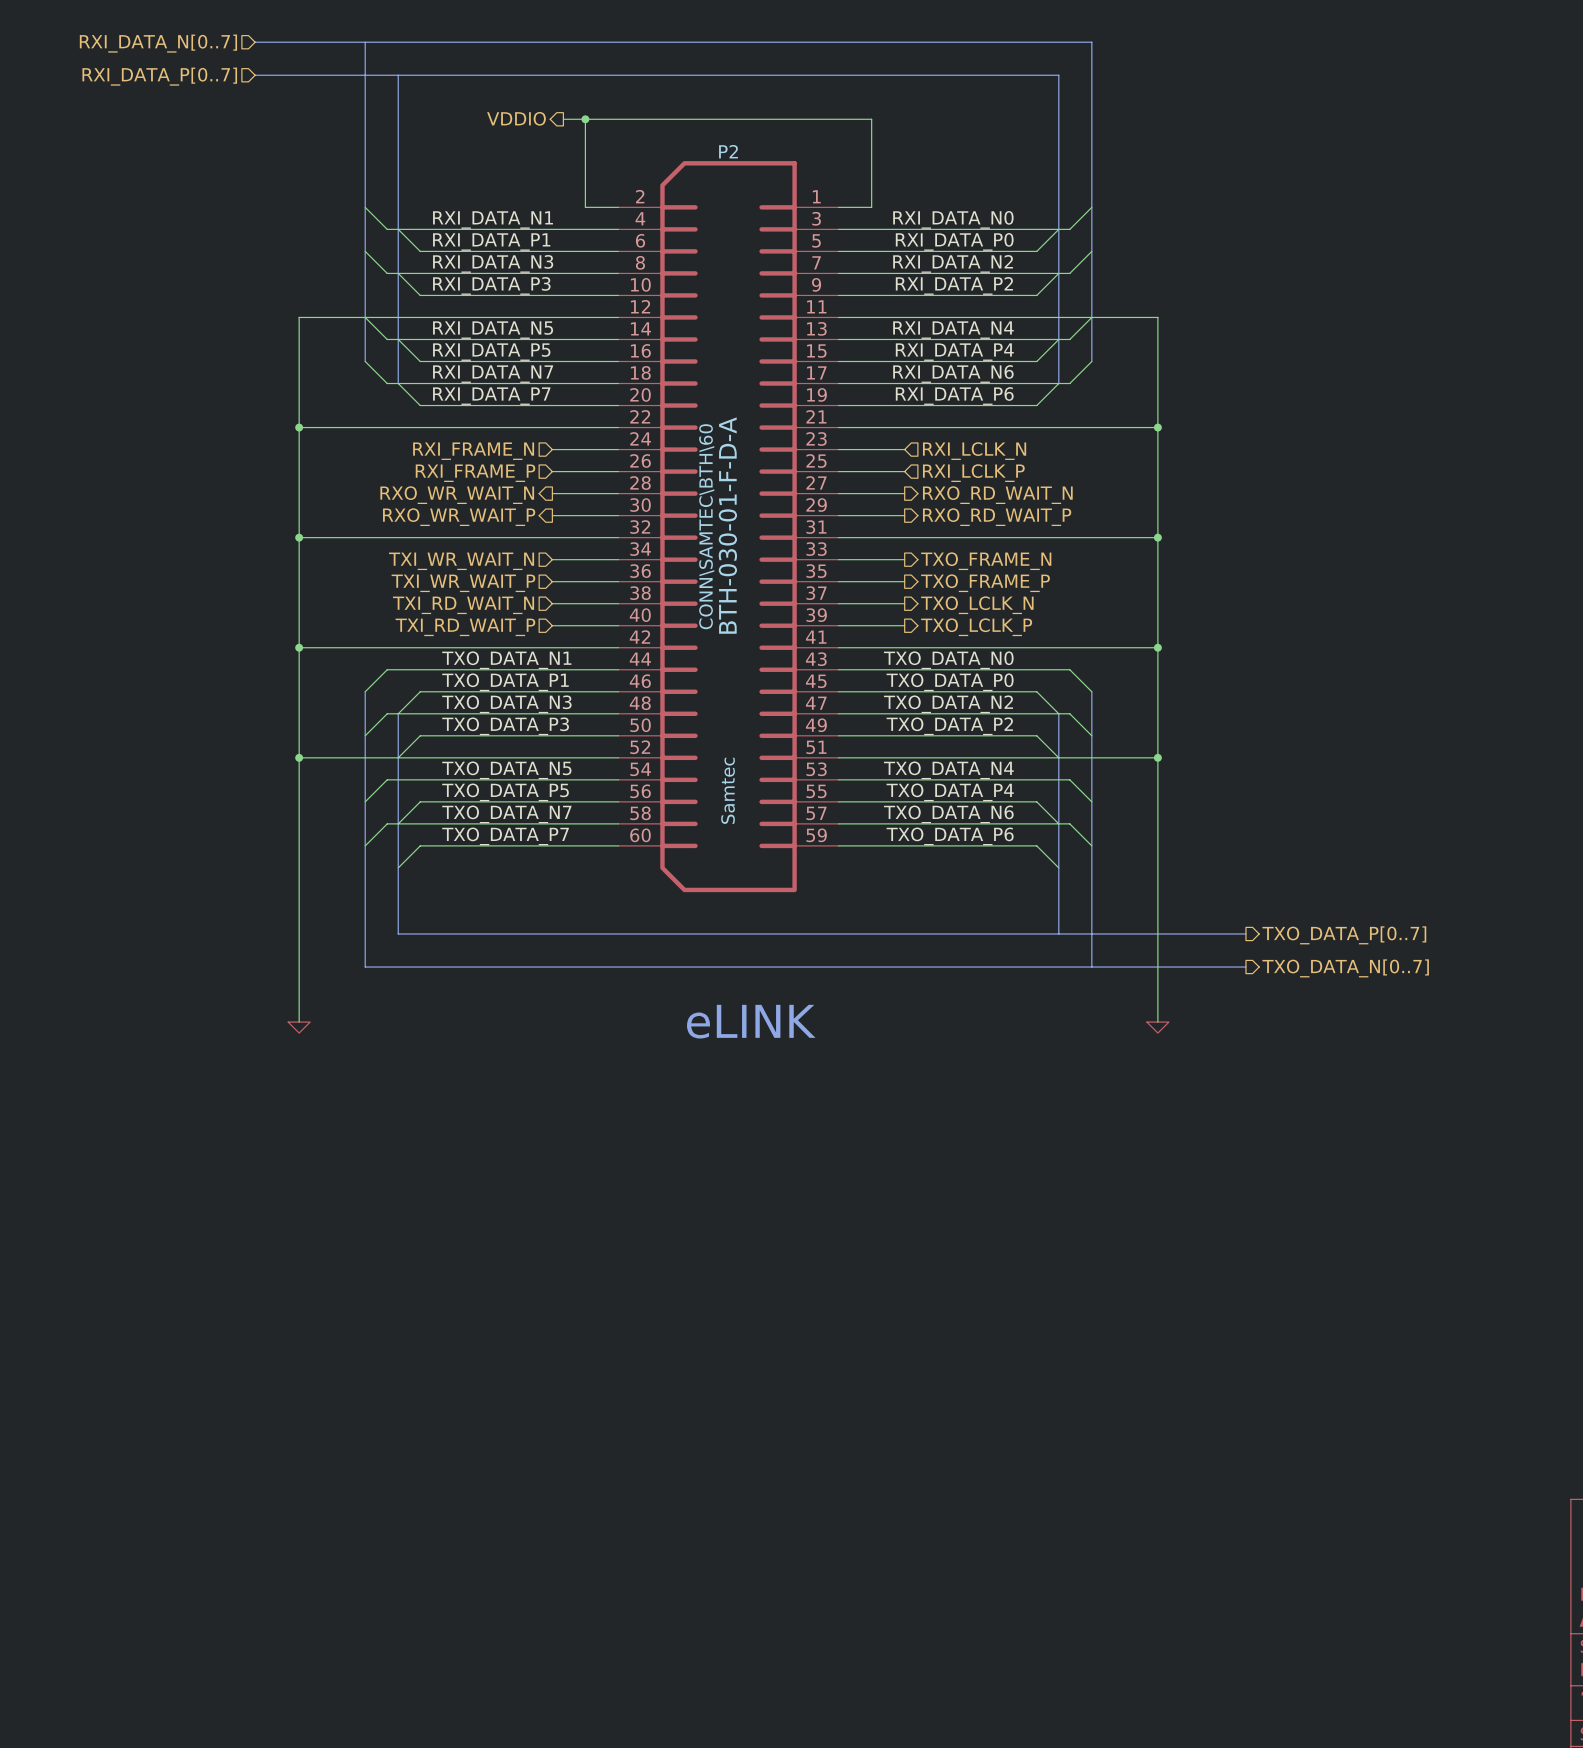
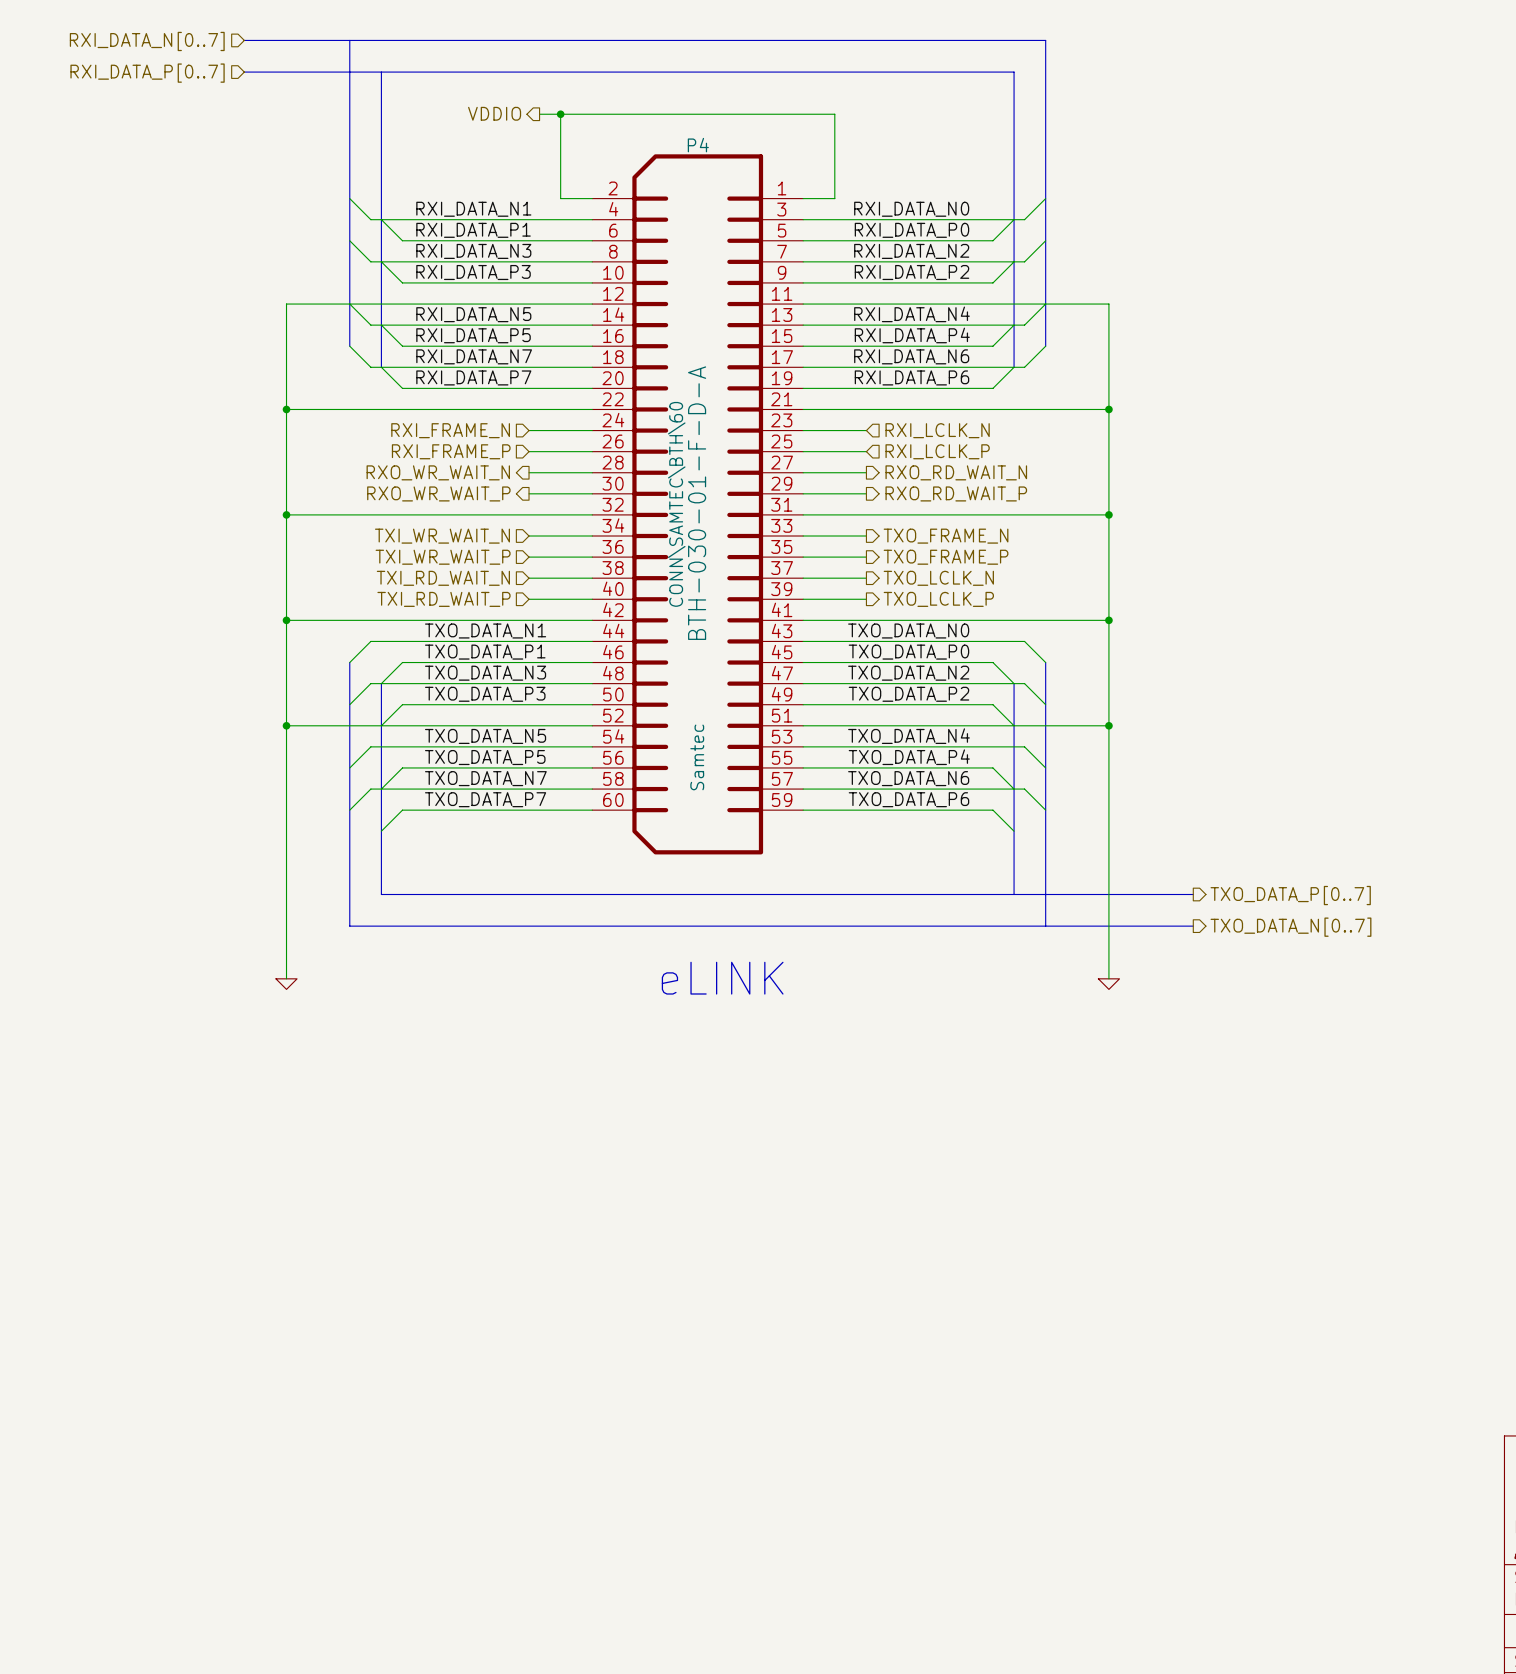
P2 name: P2 (728, 151) -> P4 (698, 145)

